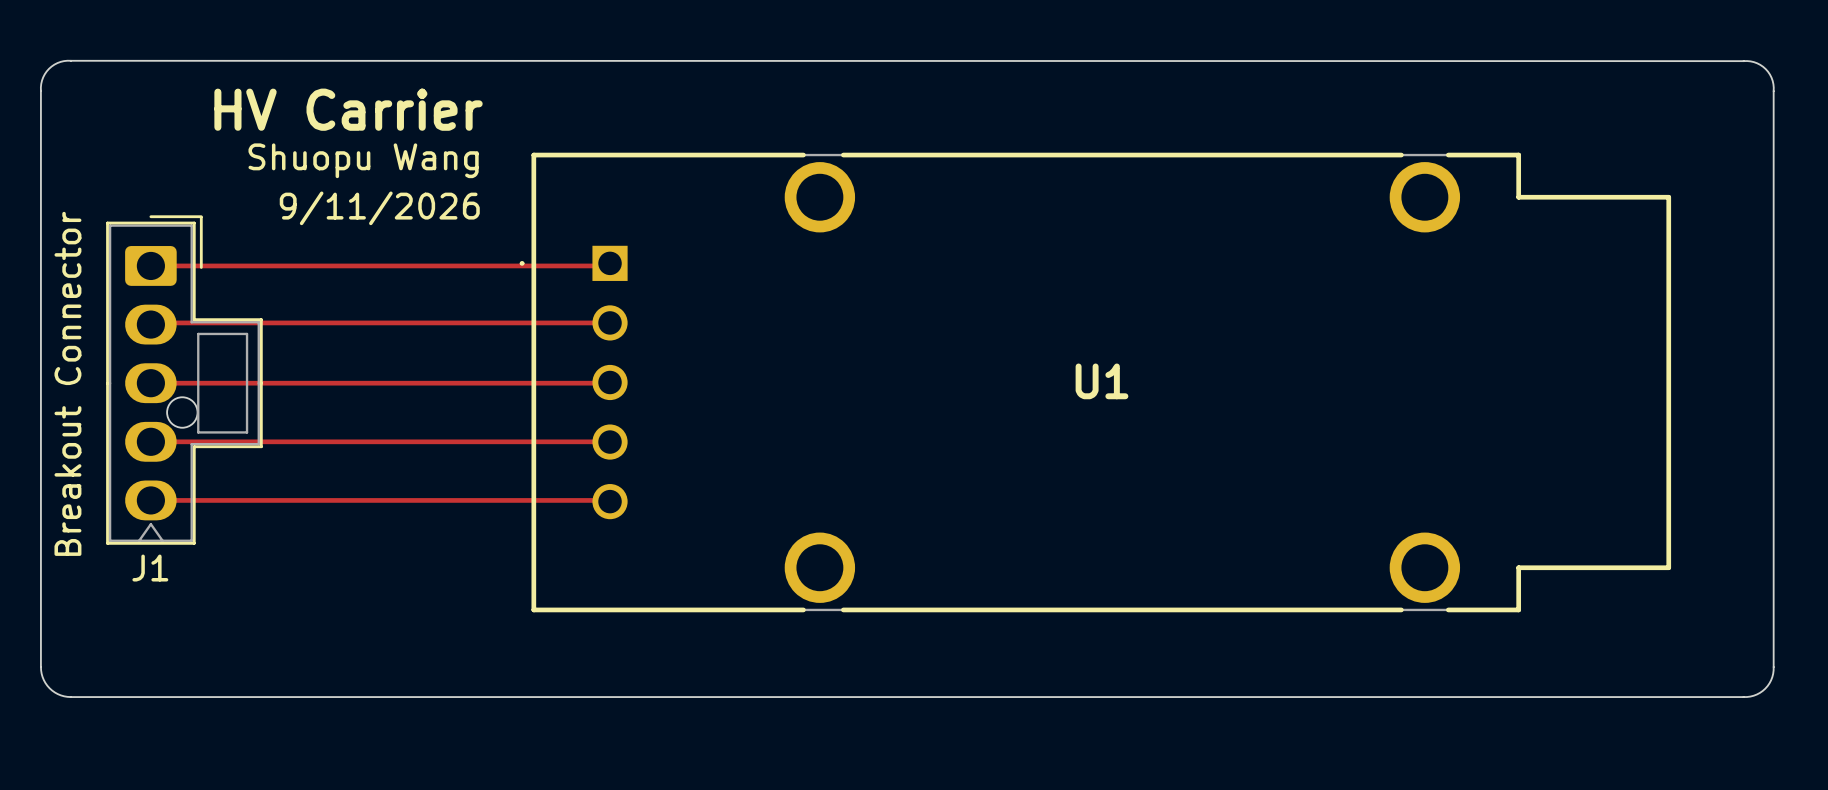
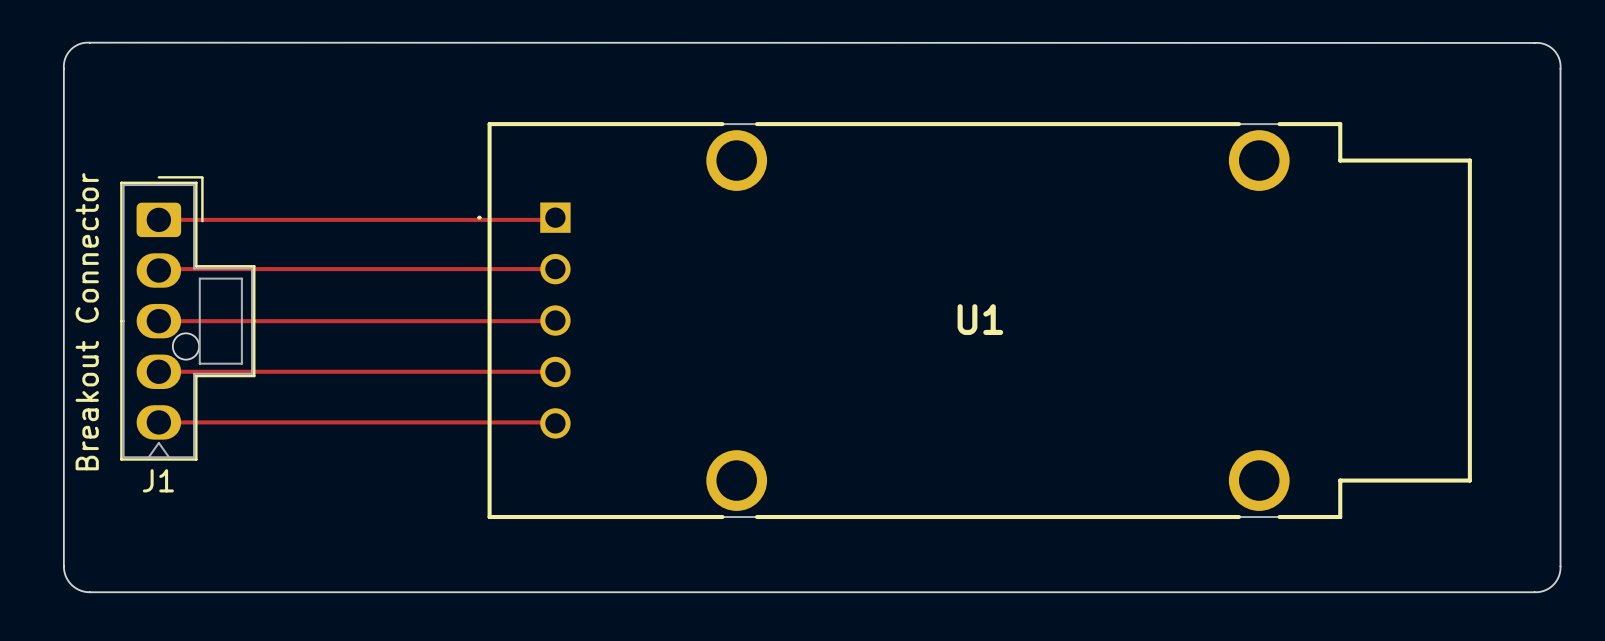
text: HV Carrier (348, 109) -> none
text: Shuopu Wang (363, 160) -> none
text: 9/11/2026 (379, 208) -> none

